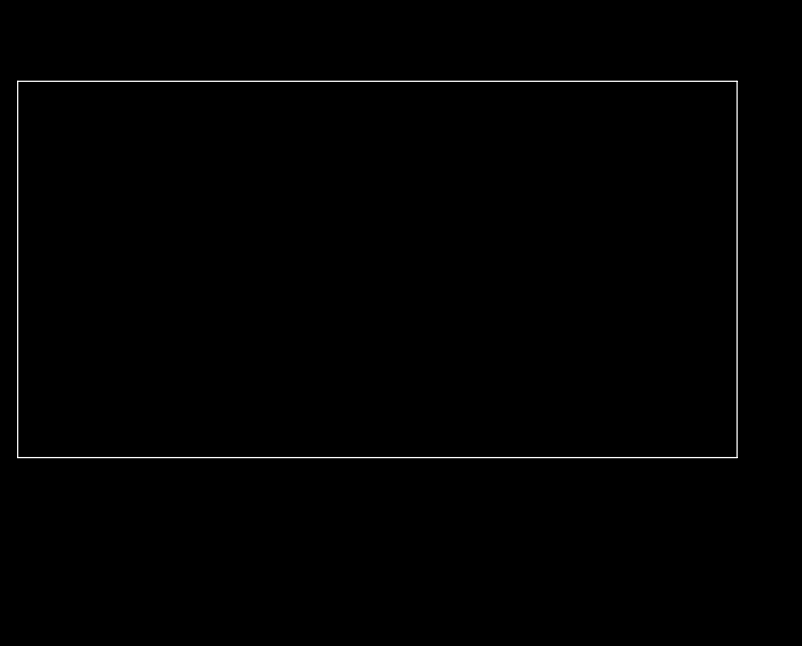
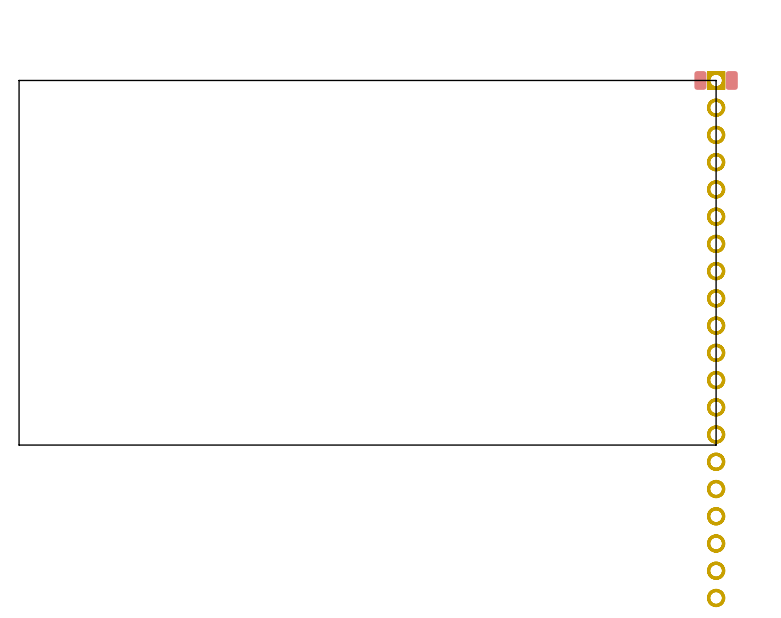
part: none -> (716, 80)
part: none -> (716, 339)

